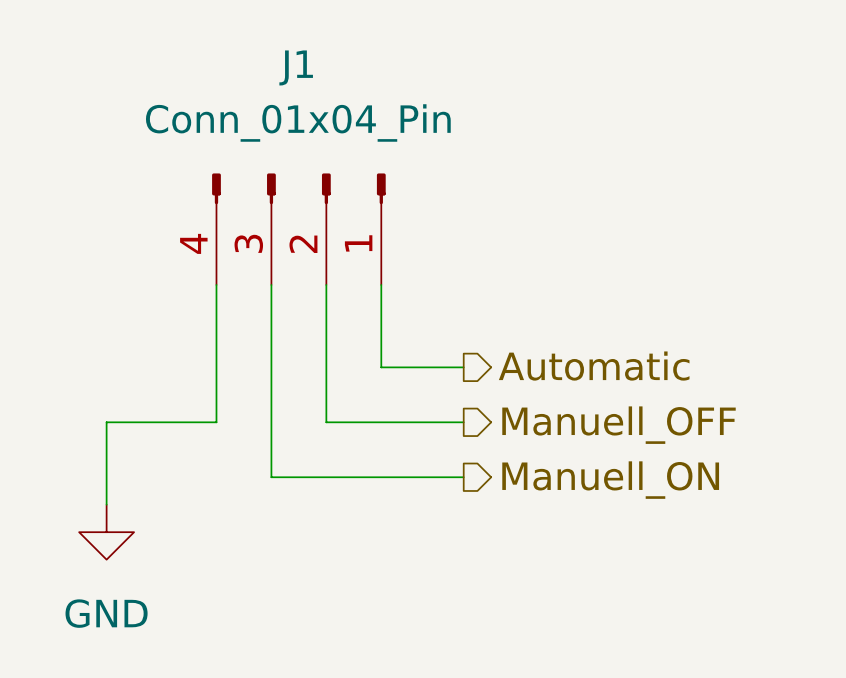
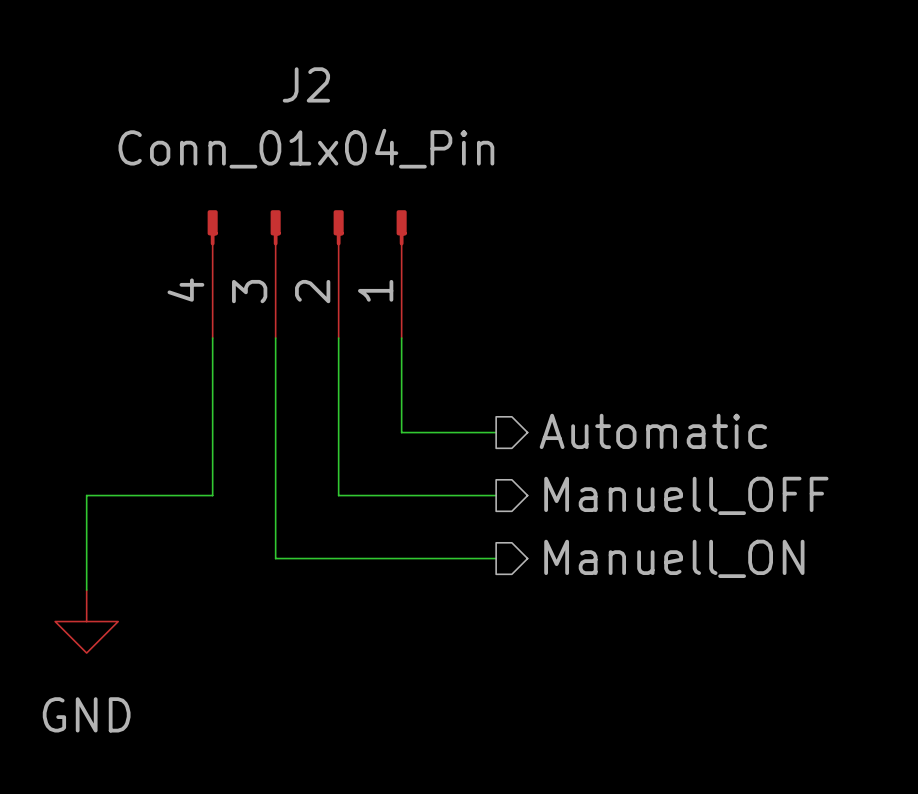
J1 name: J1 (296, 67) -> J2 (306, 84)

